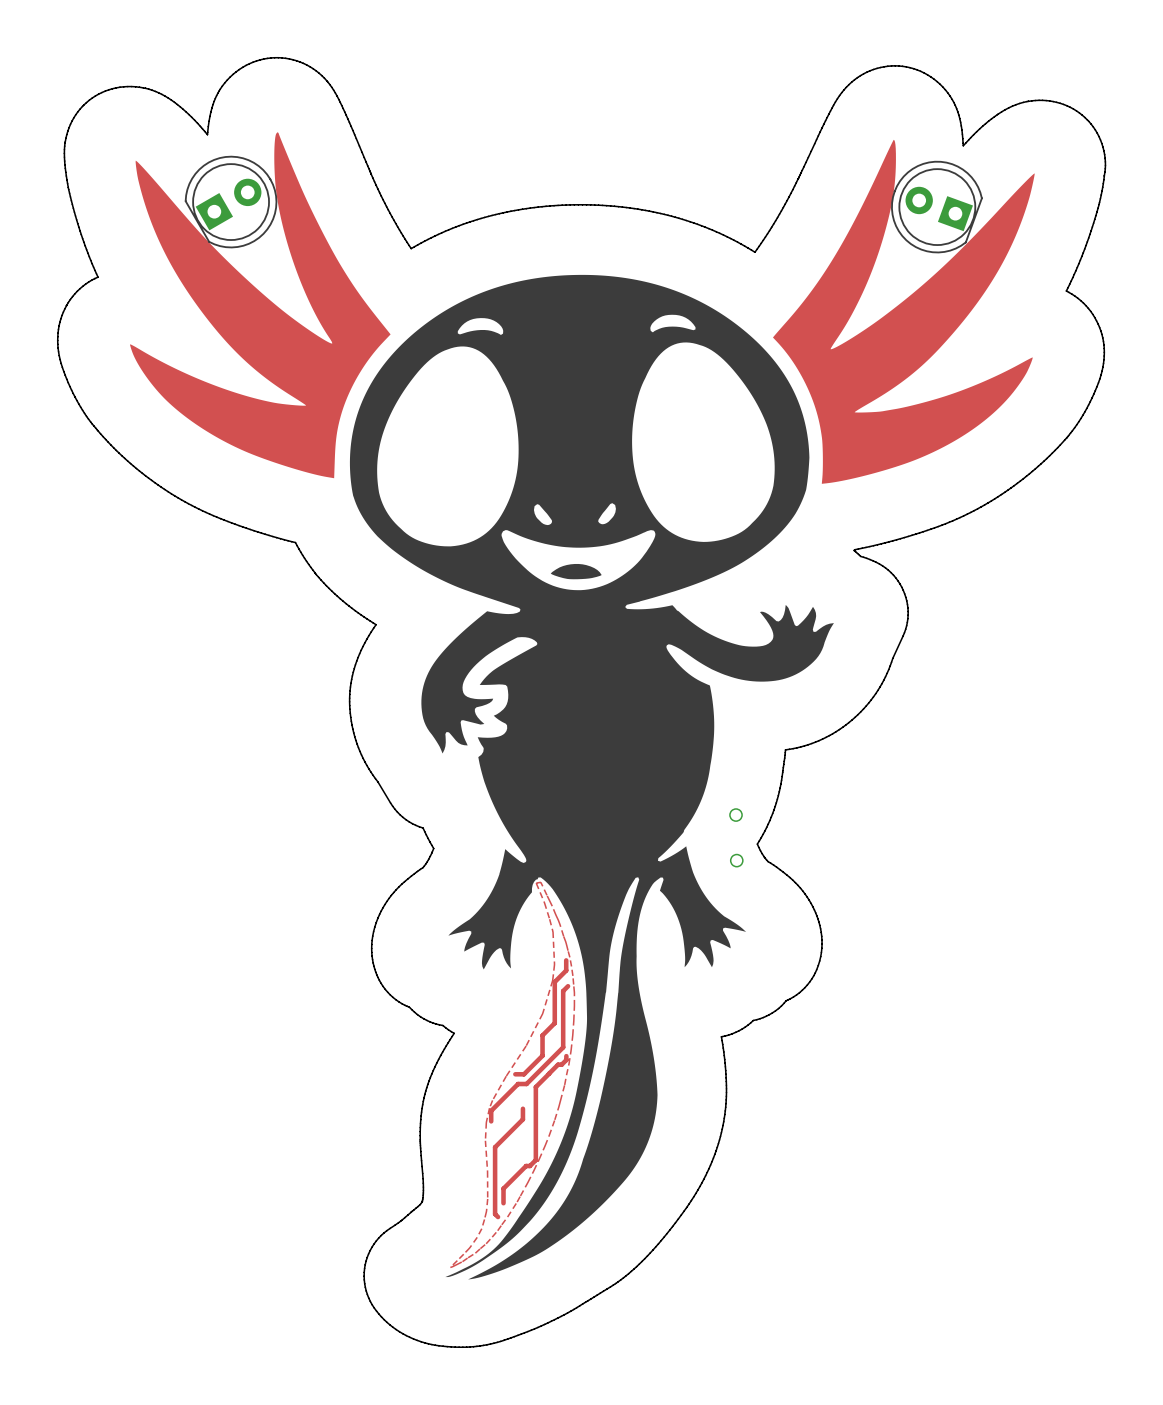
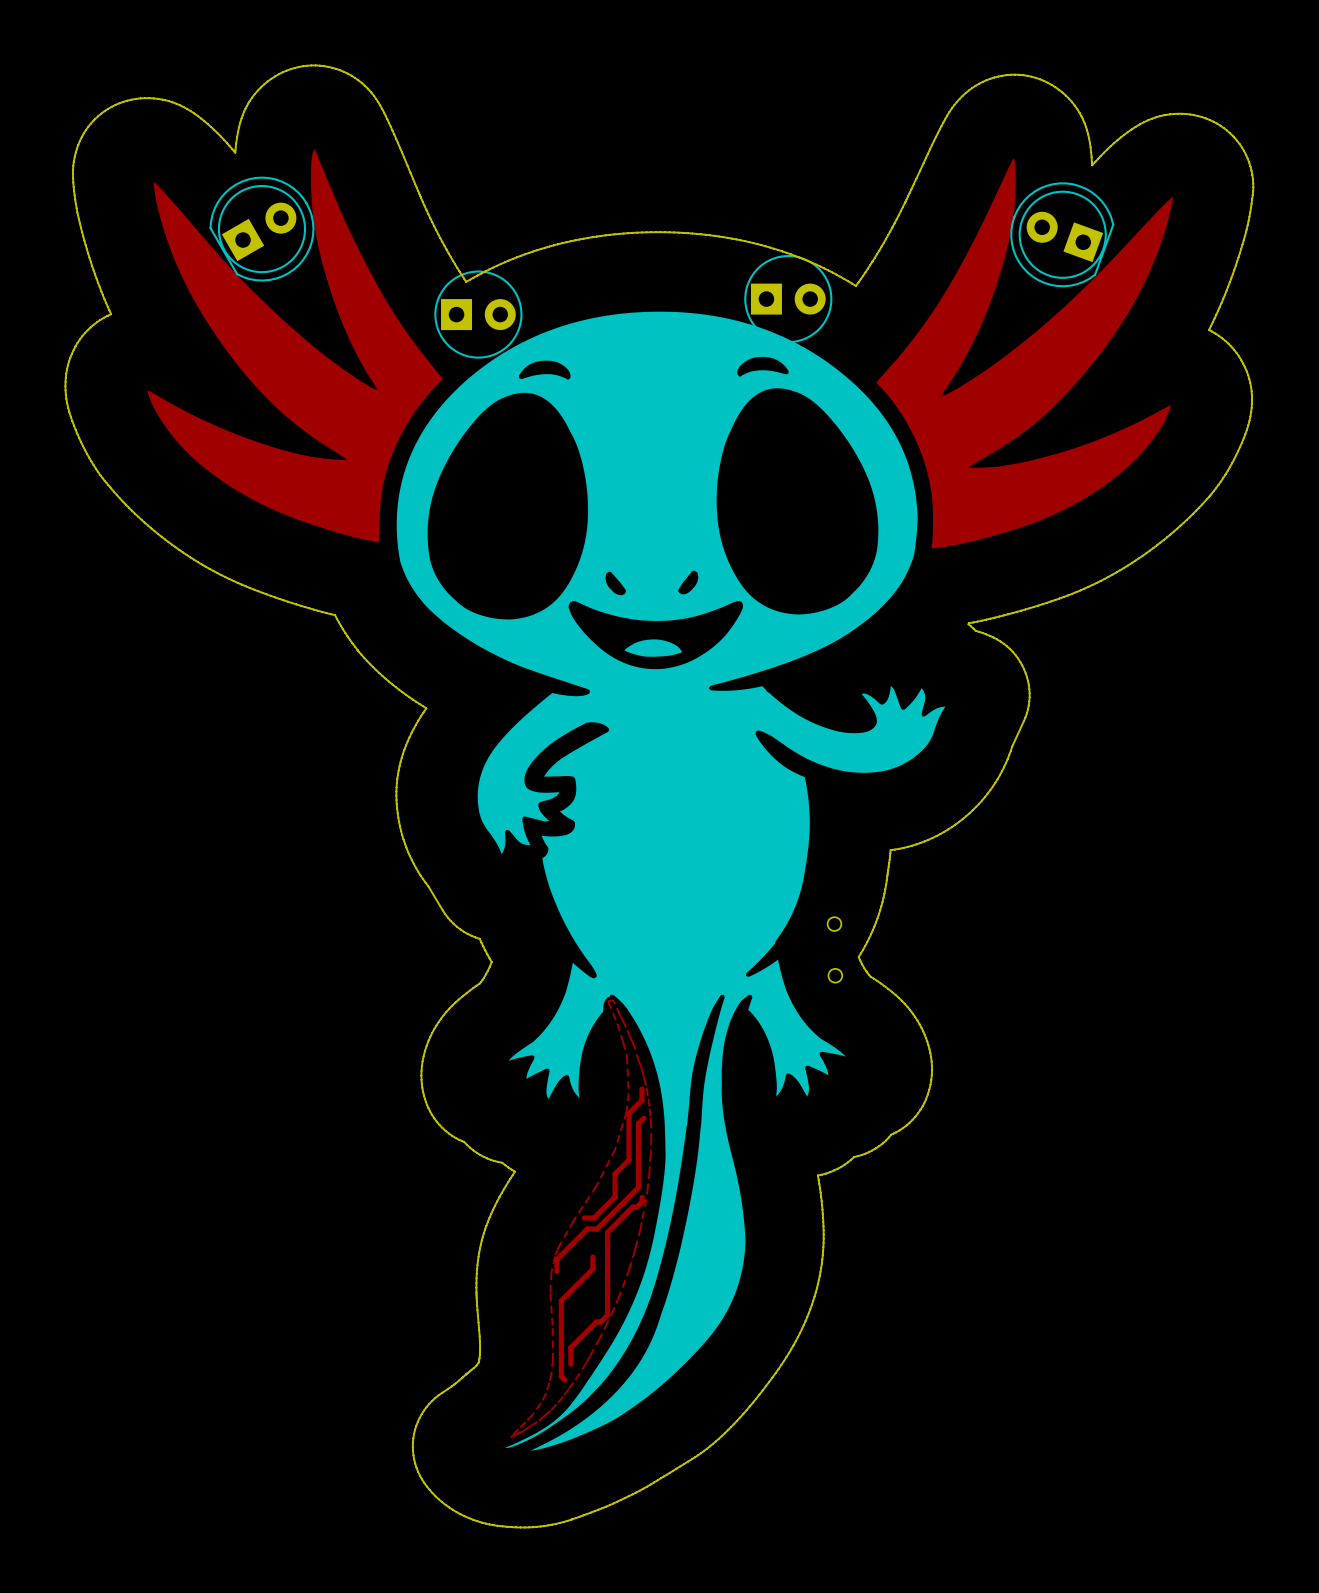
part: none -> (788, 299)
part: none -> (478, 314)

